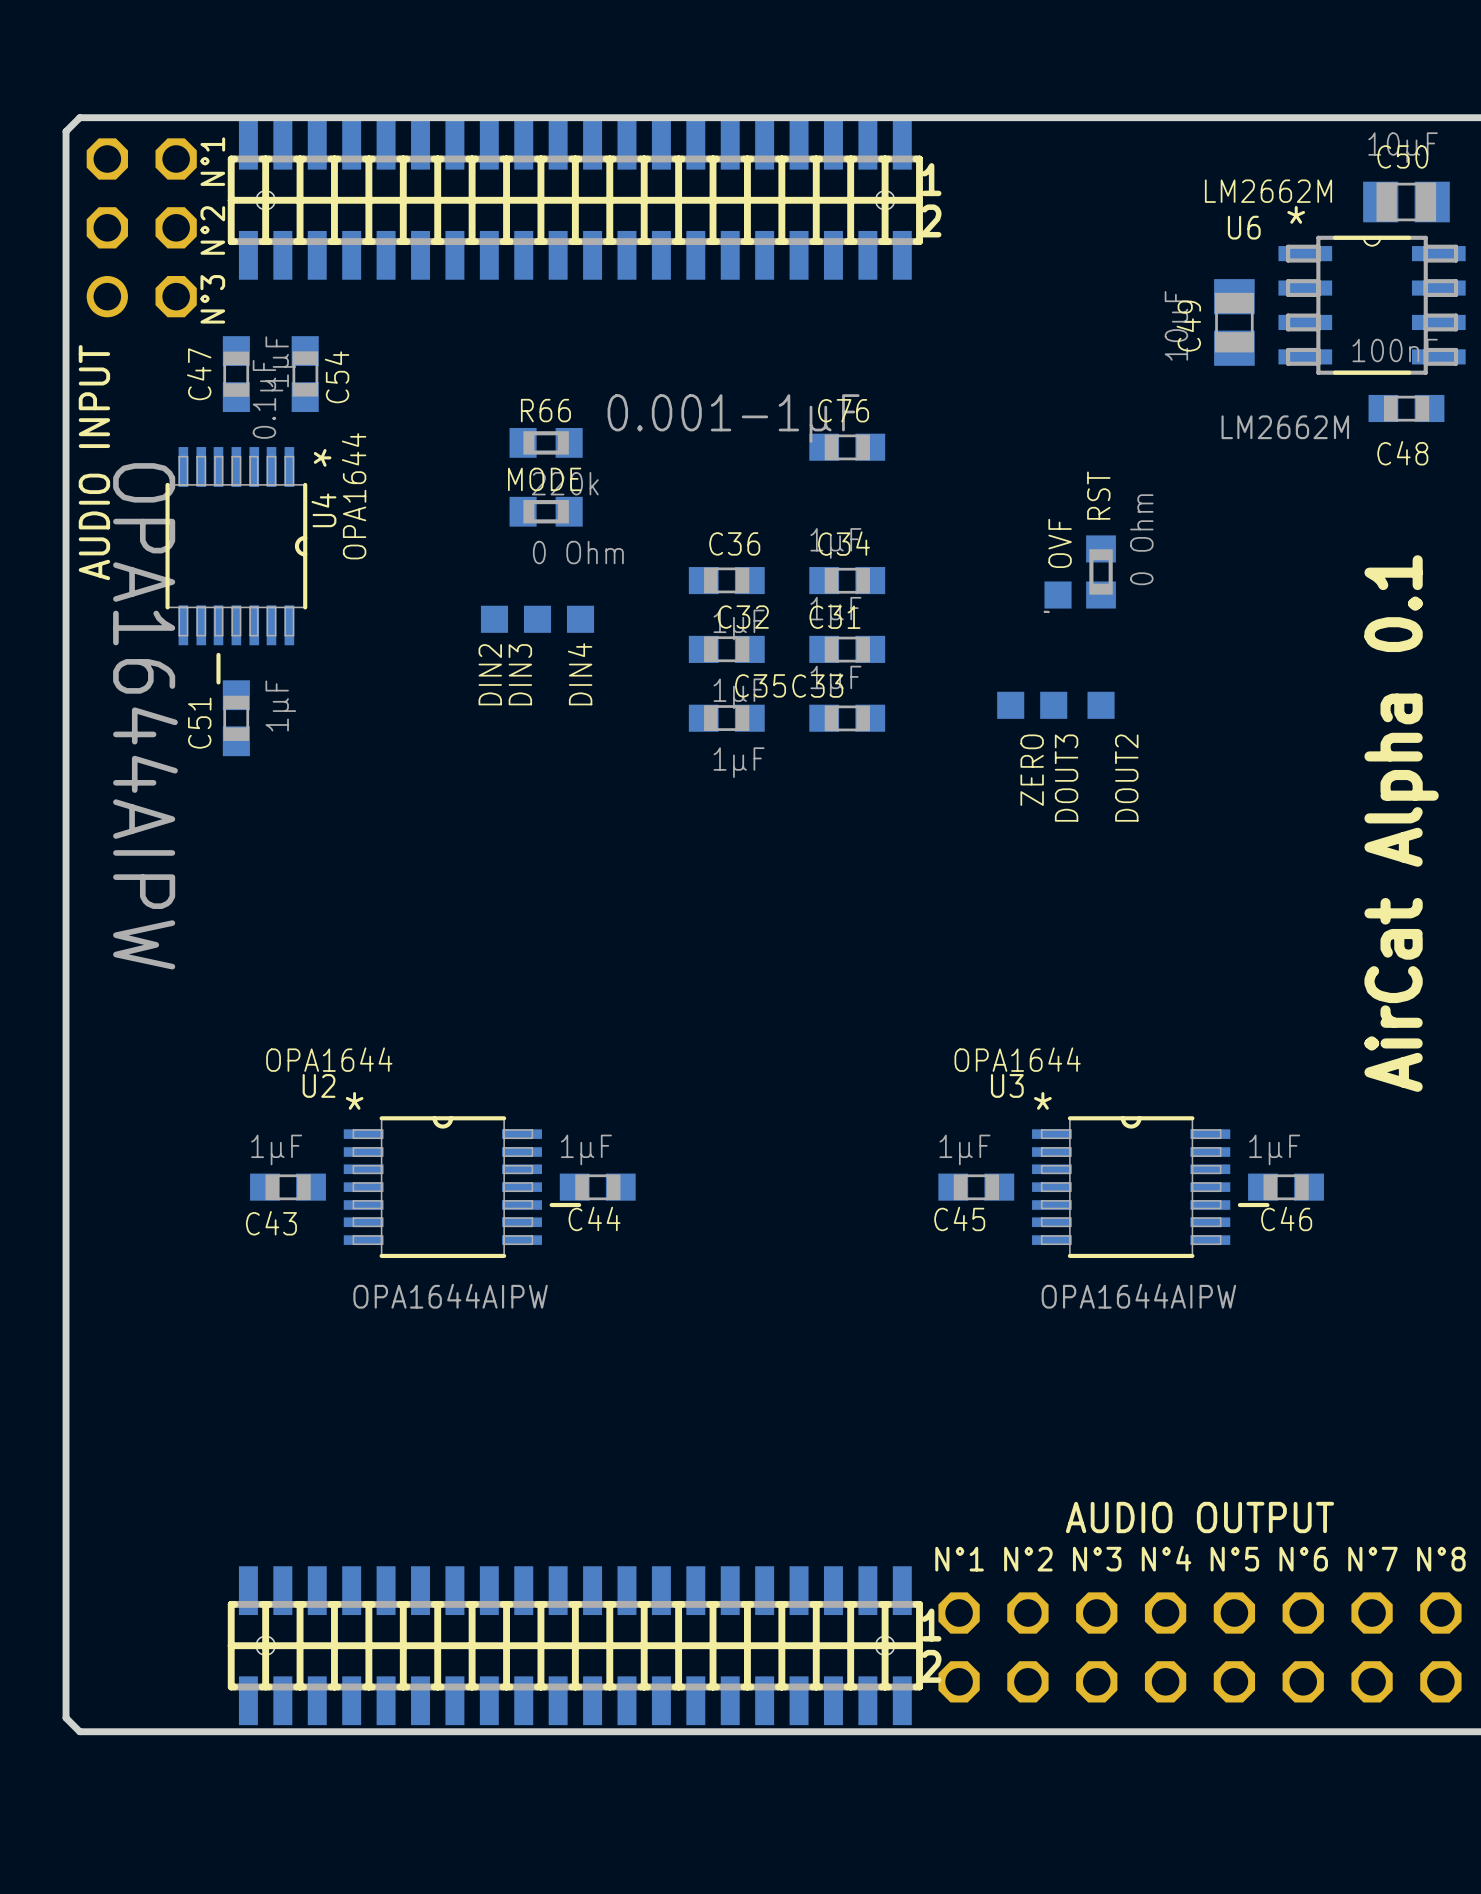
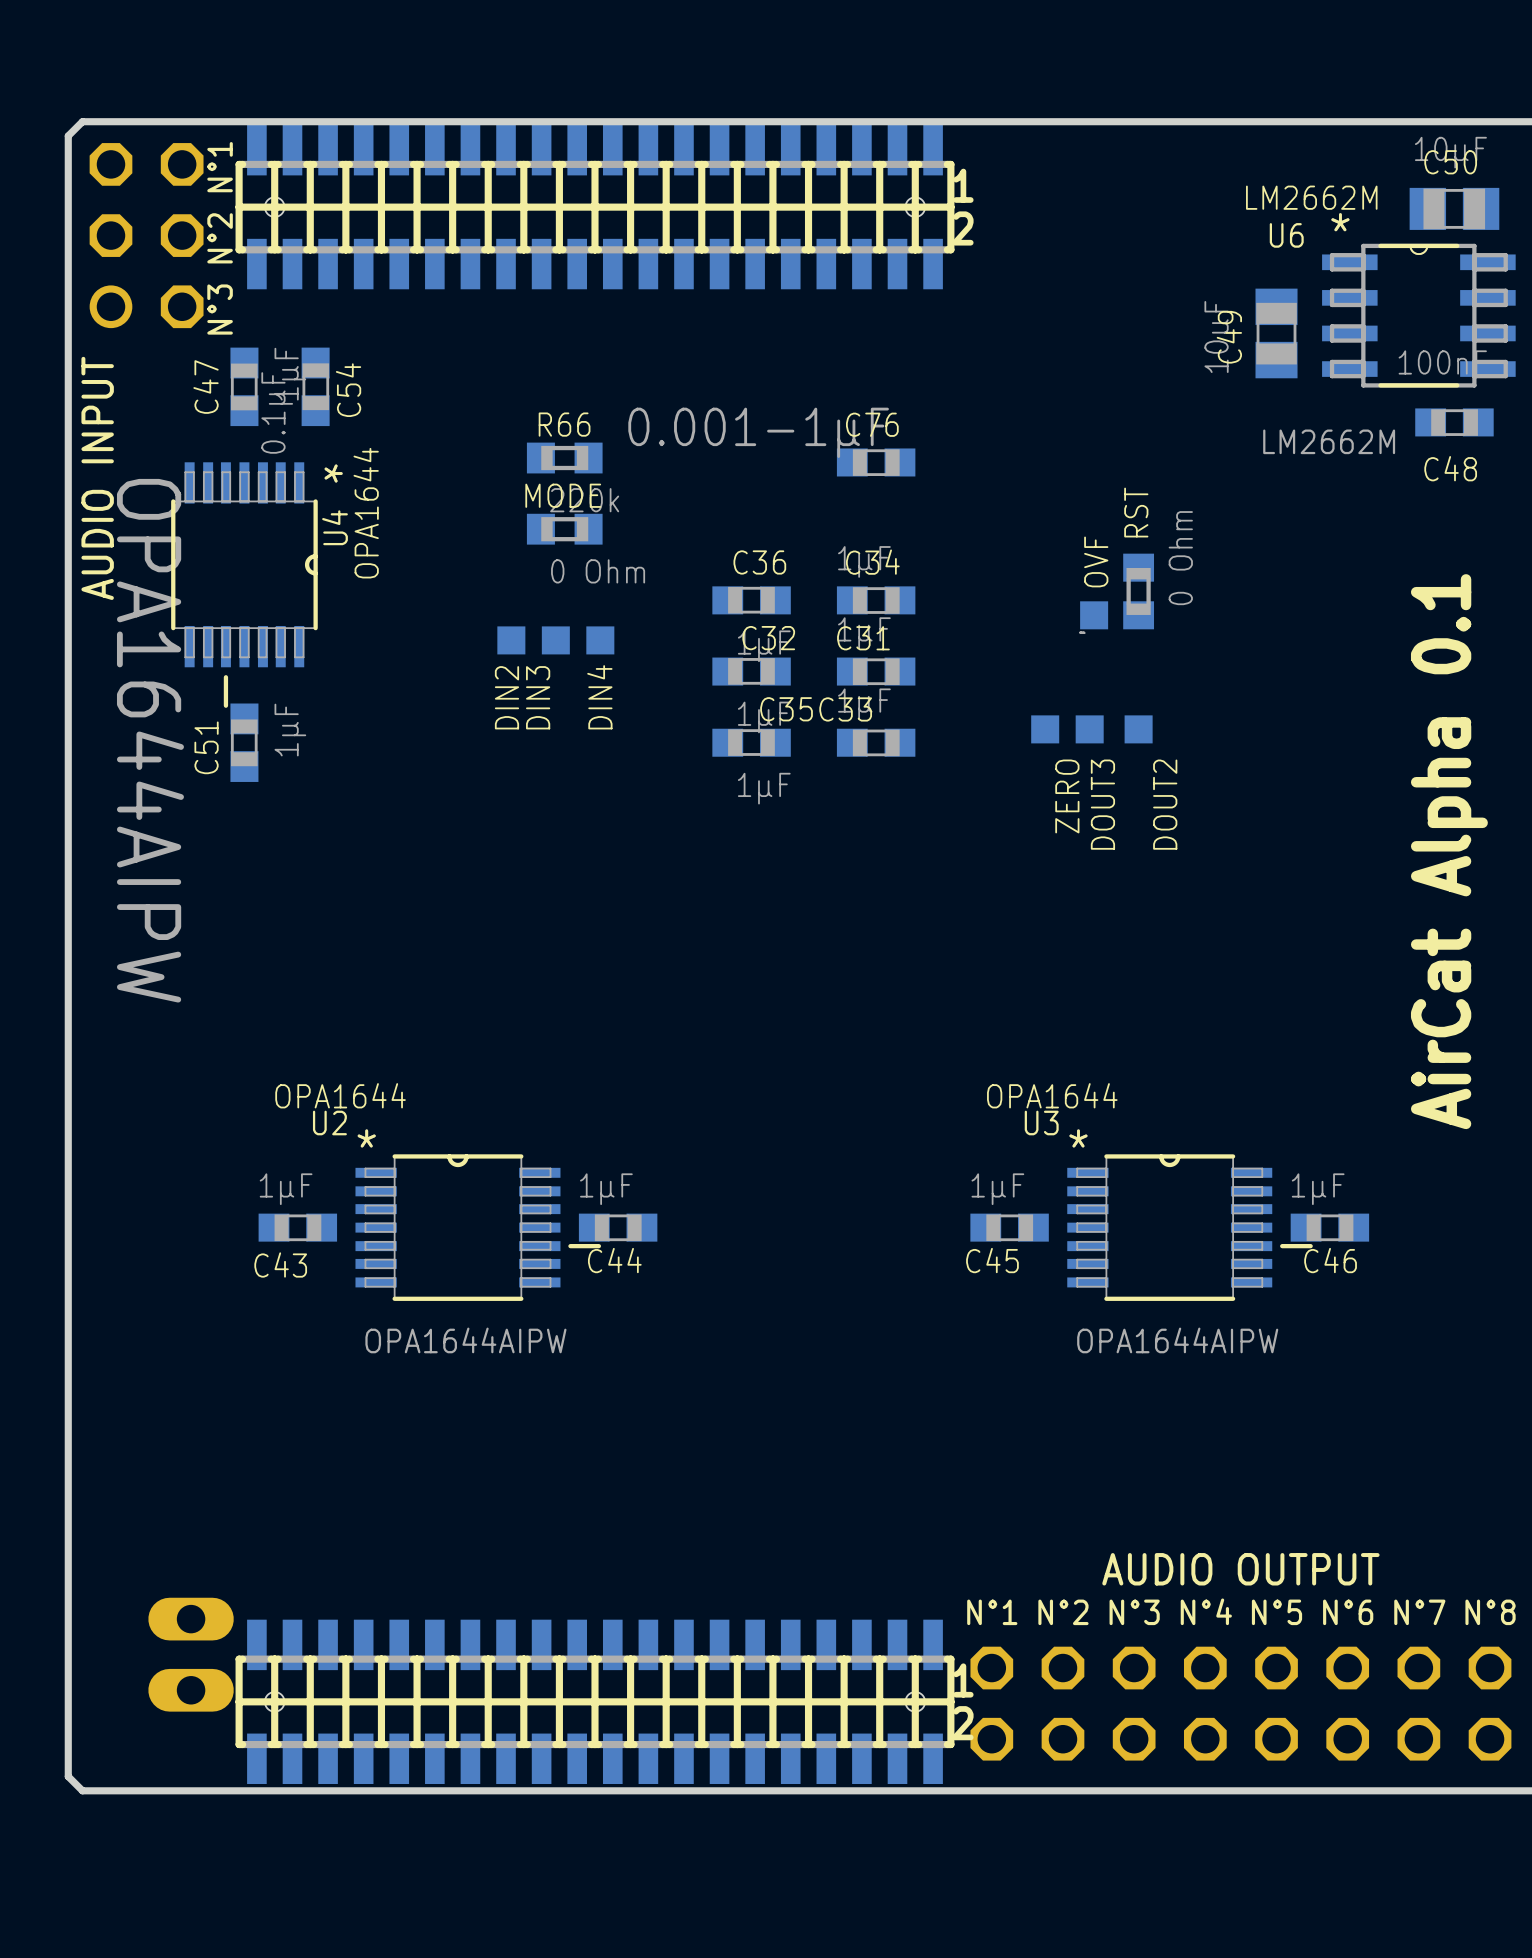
part: none -> (191, 1654)

